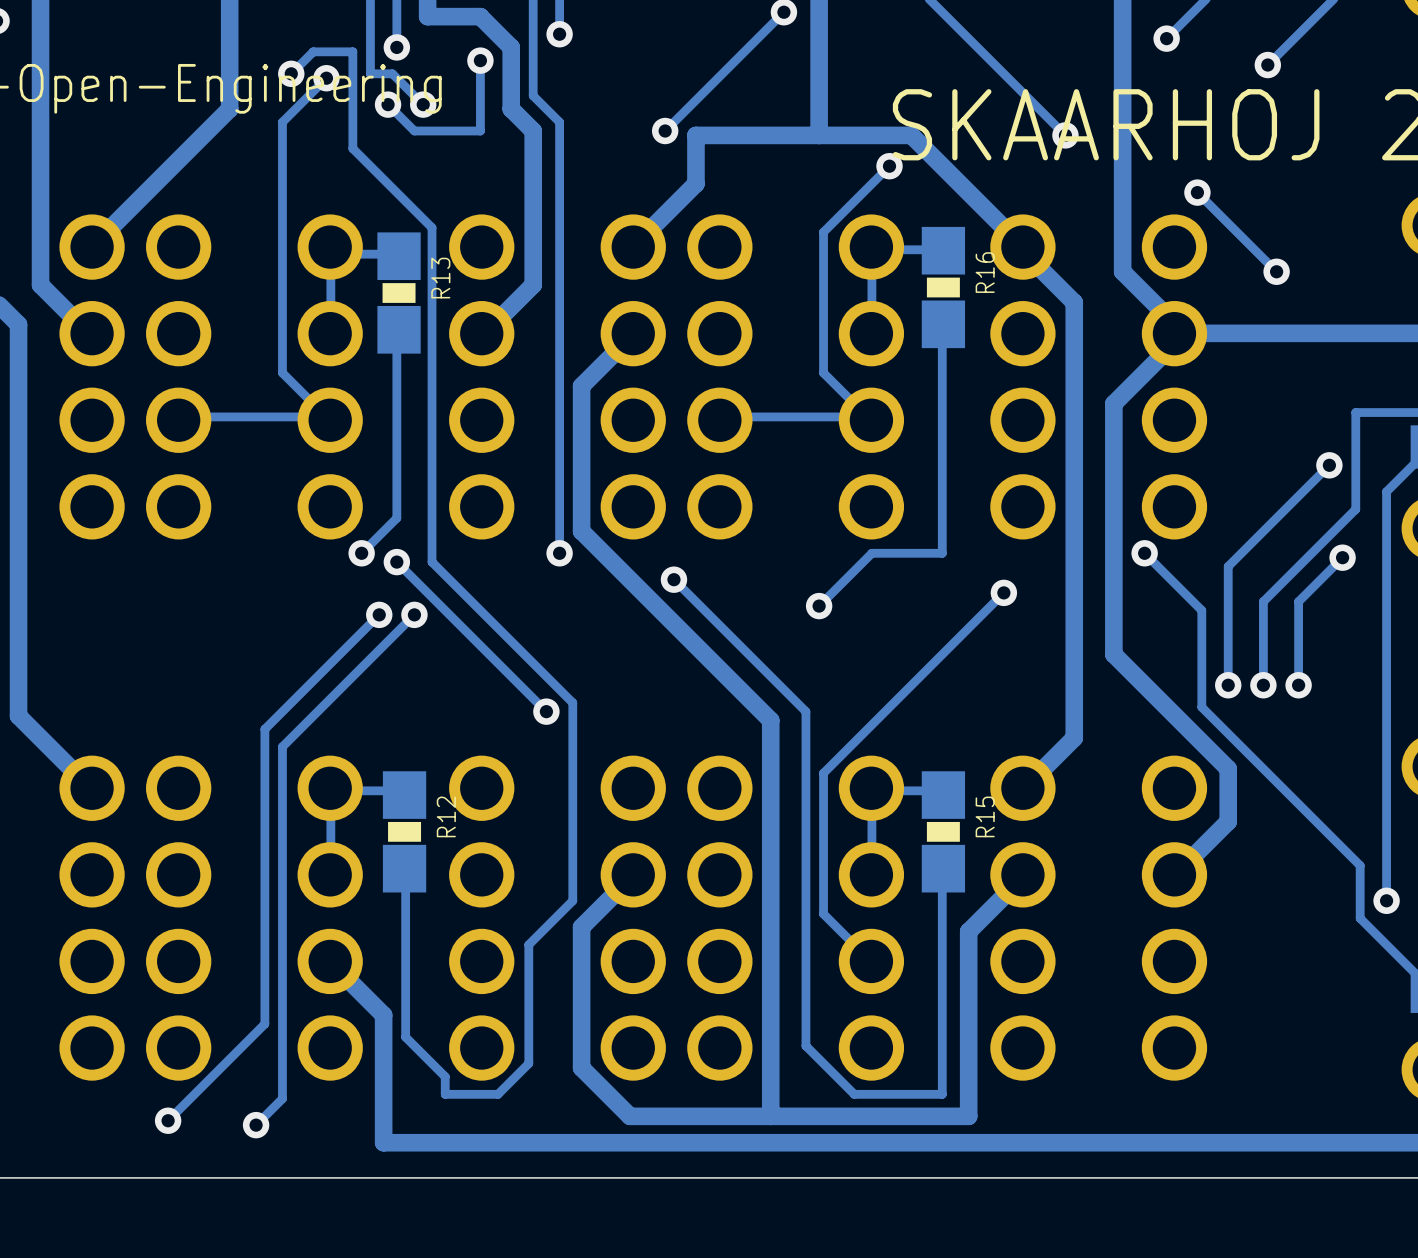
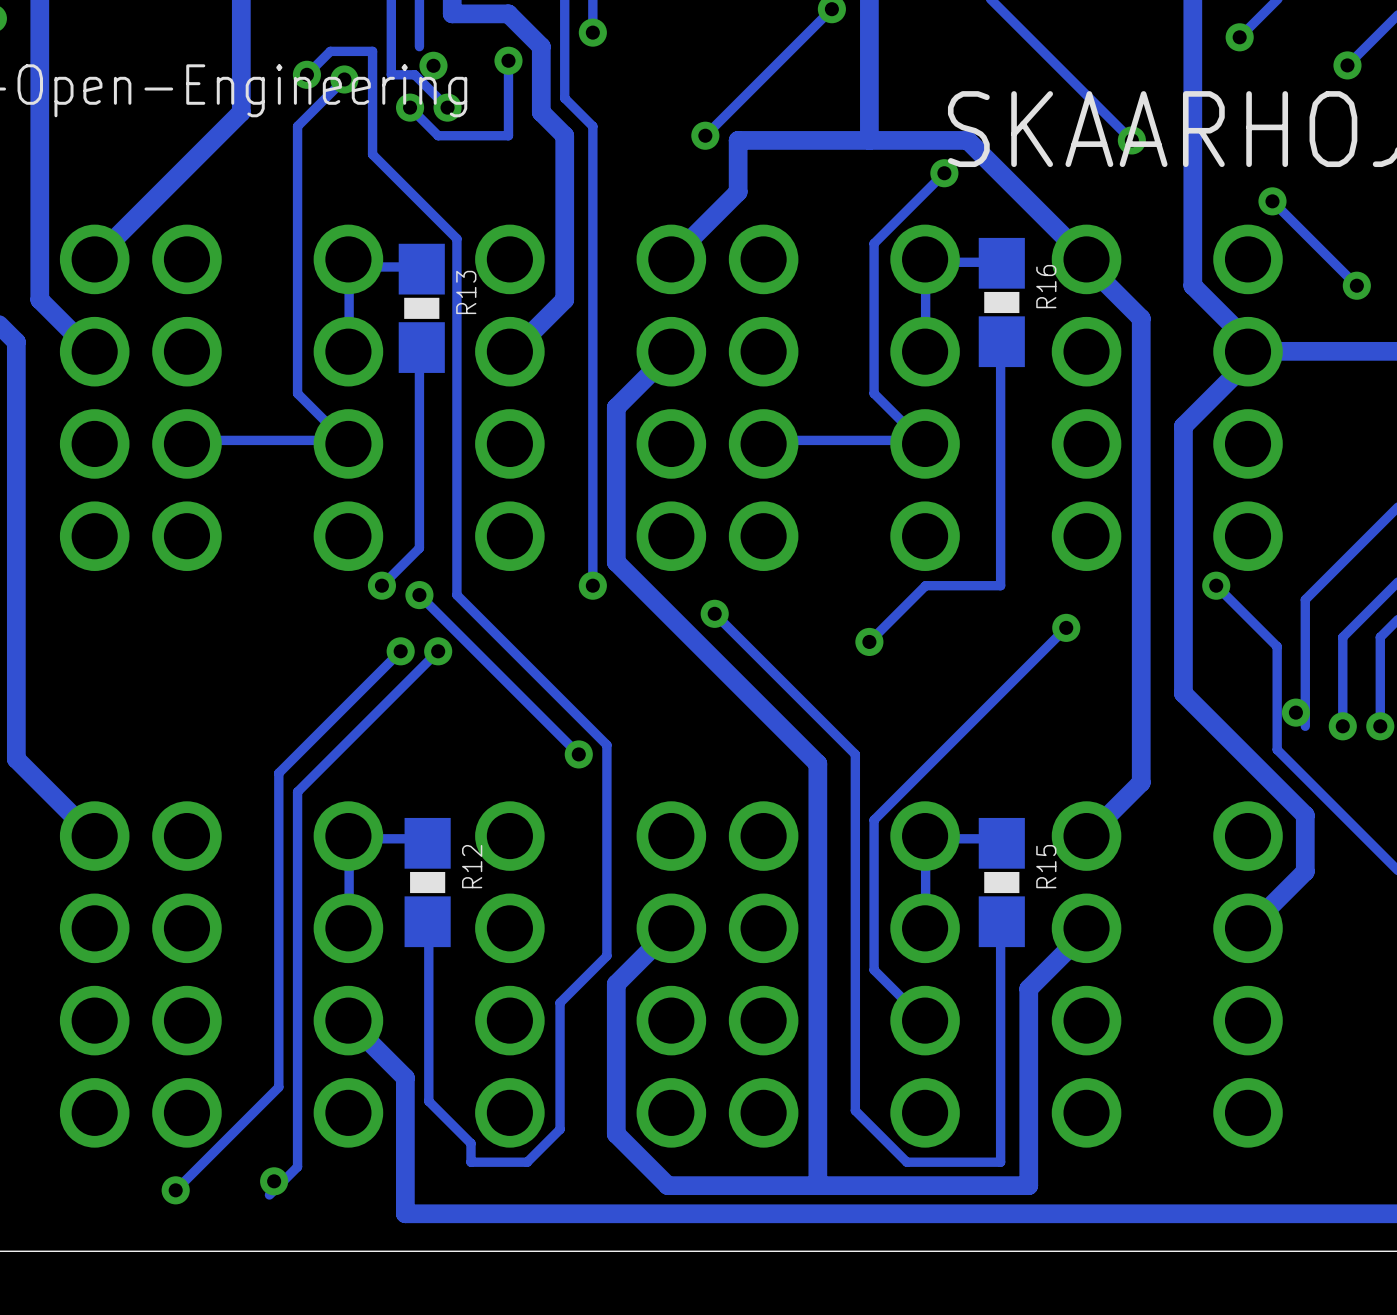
via position: (396, 47) -> (433, 65)
via position: (1228, 685) -> (1295, 712)
via position: (256, 1125) -> (274, 1181)

